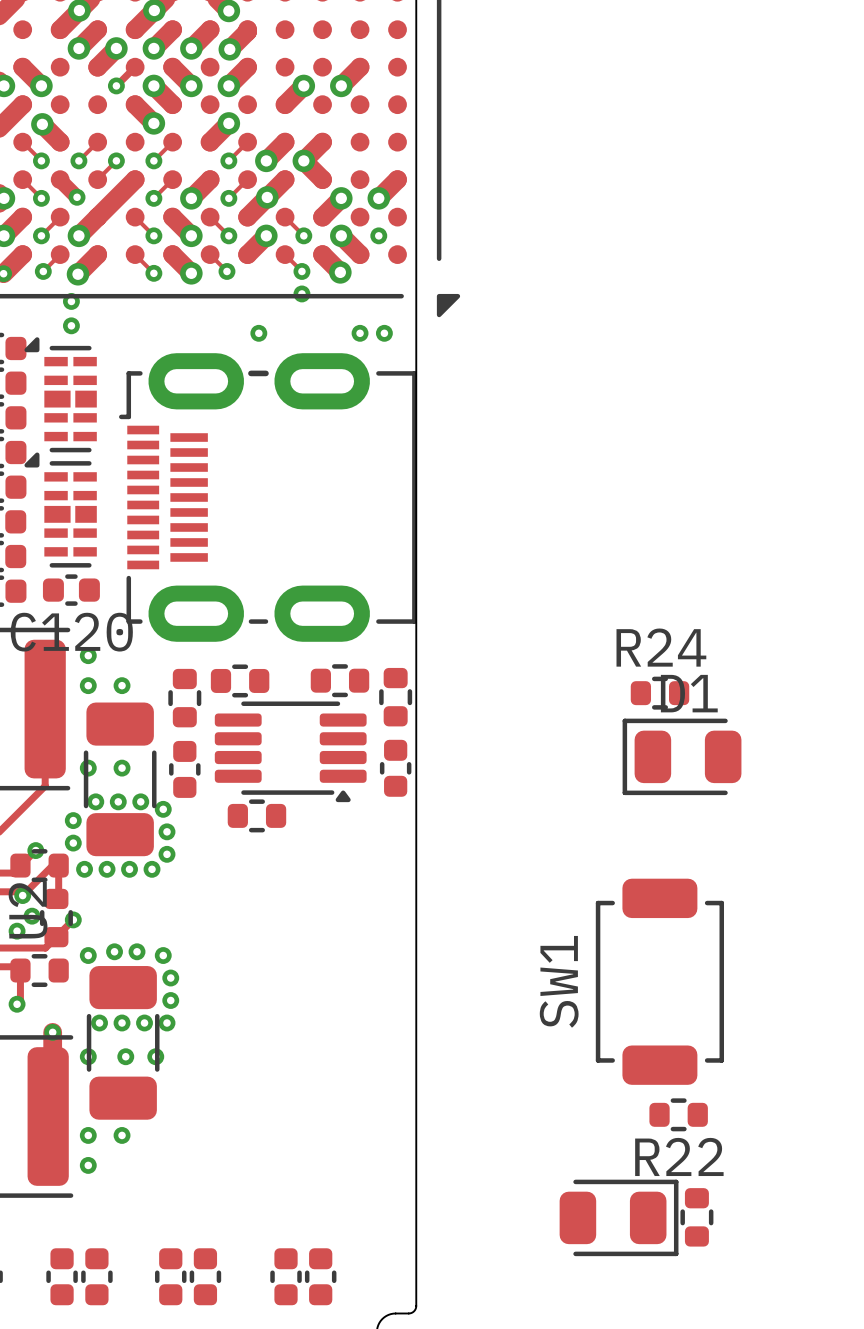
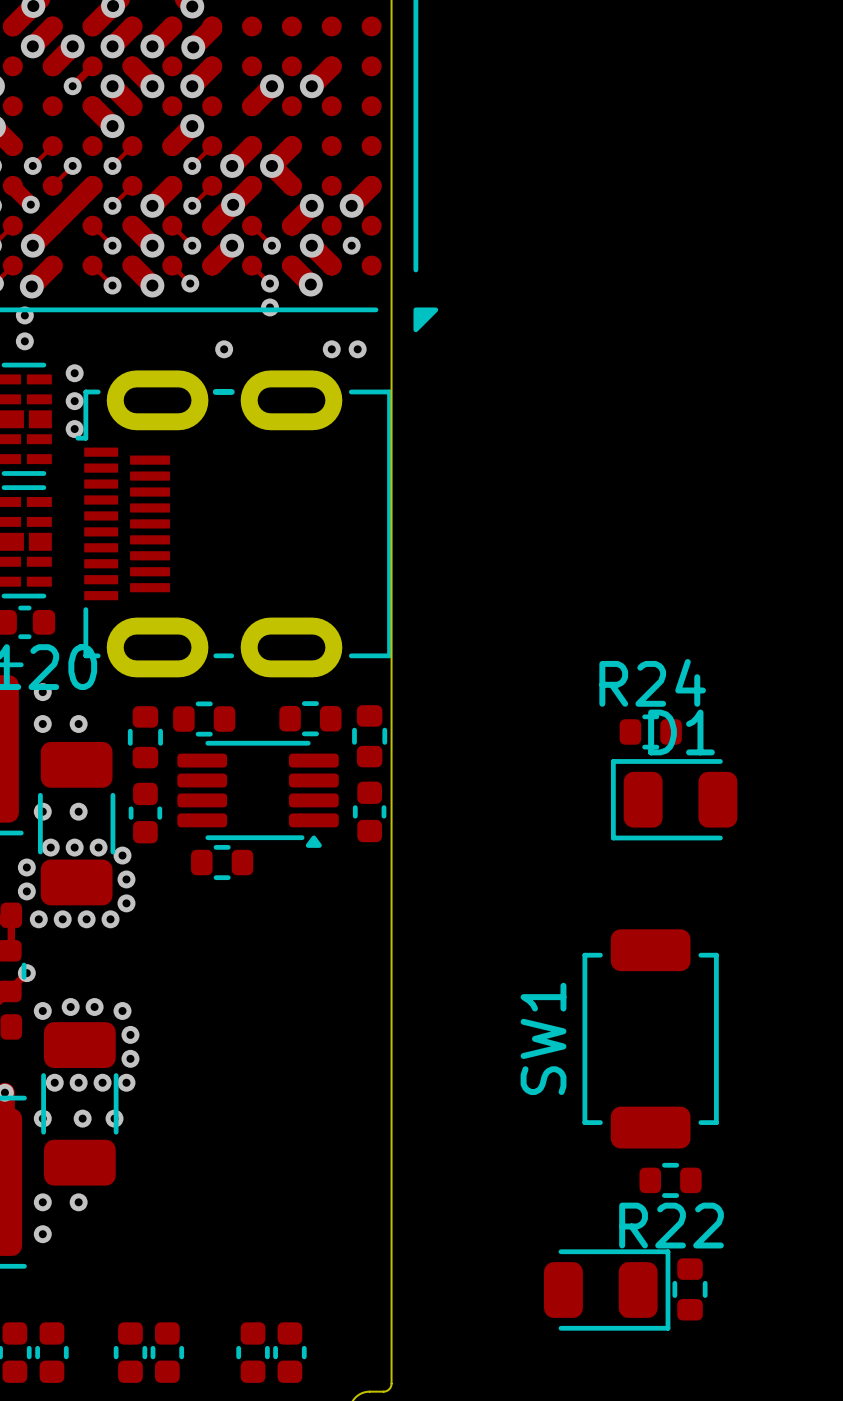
via: none -> (74, 373)
via: none -> (74, 401)
via: none -> (74, 429)

